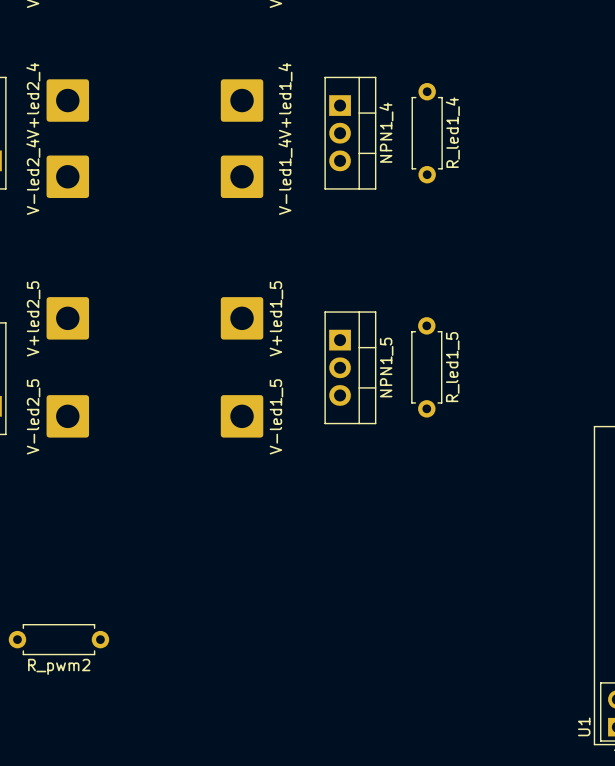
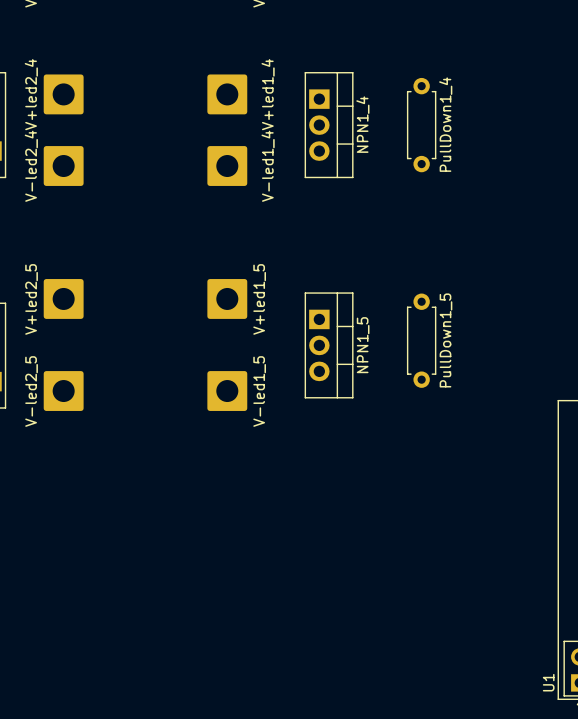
R_led1_4: (427, 133) -> none
PullDown1_4: none -> (421, 125)
PullDown1_5: none -> (421, 340)
R_led1_5: (426, 367) -> none
R_pwm2: (58, 639) -> none

